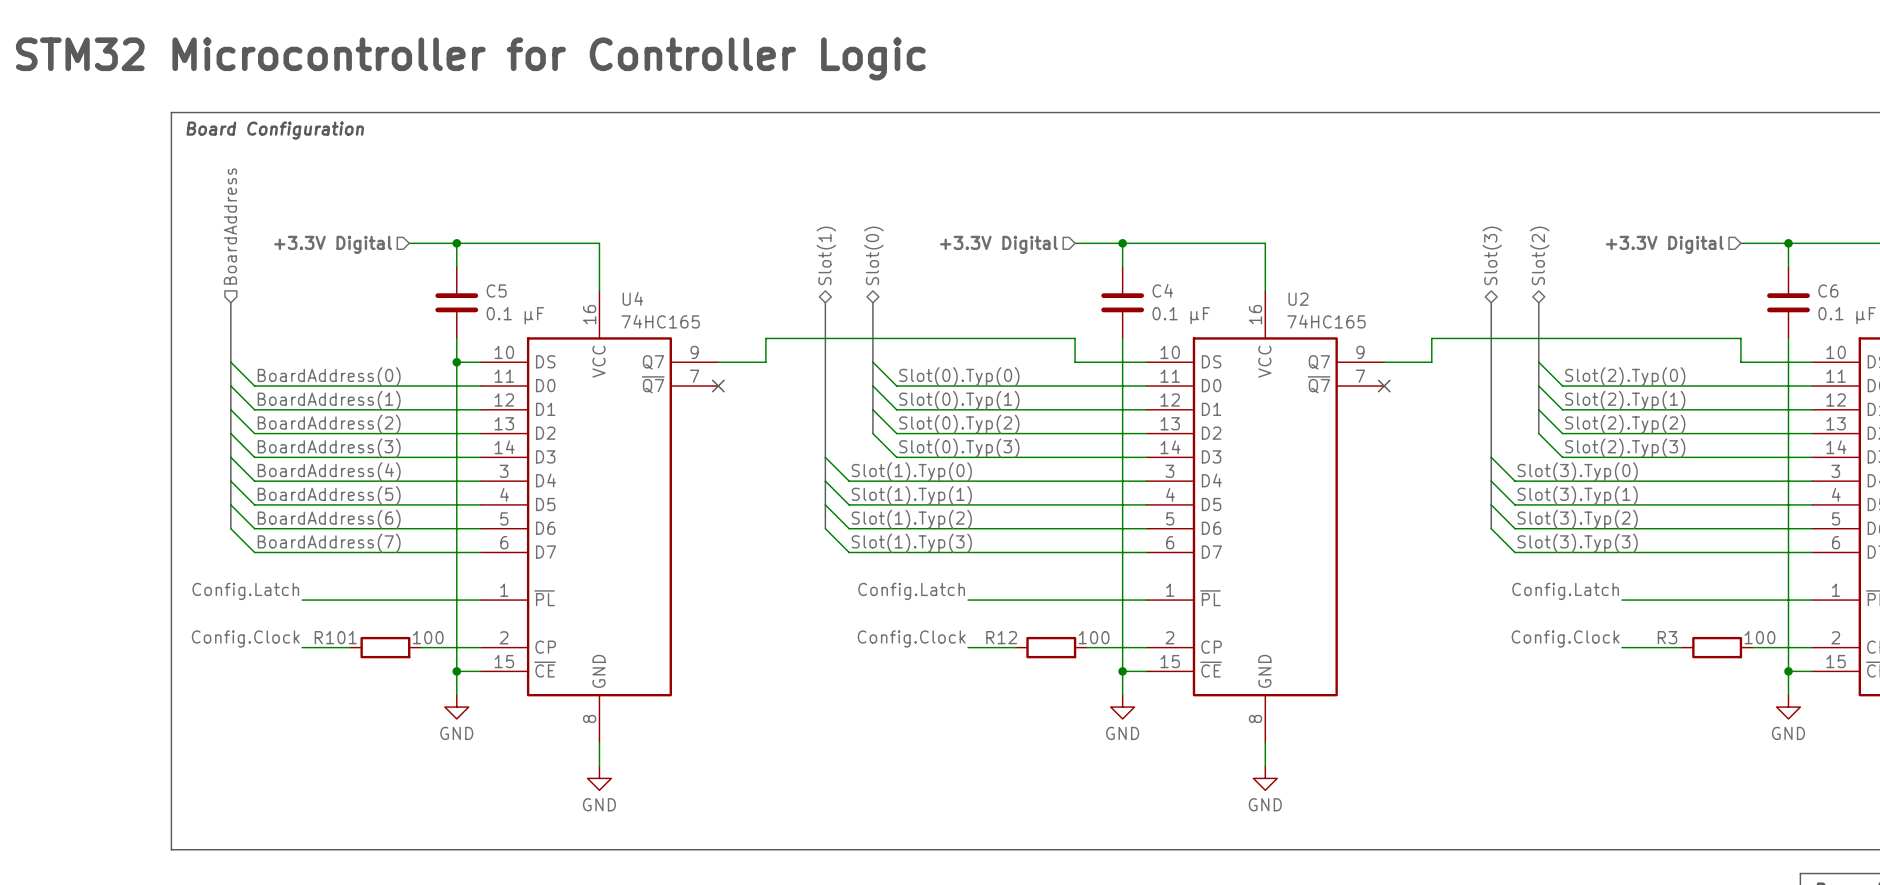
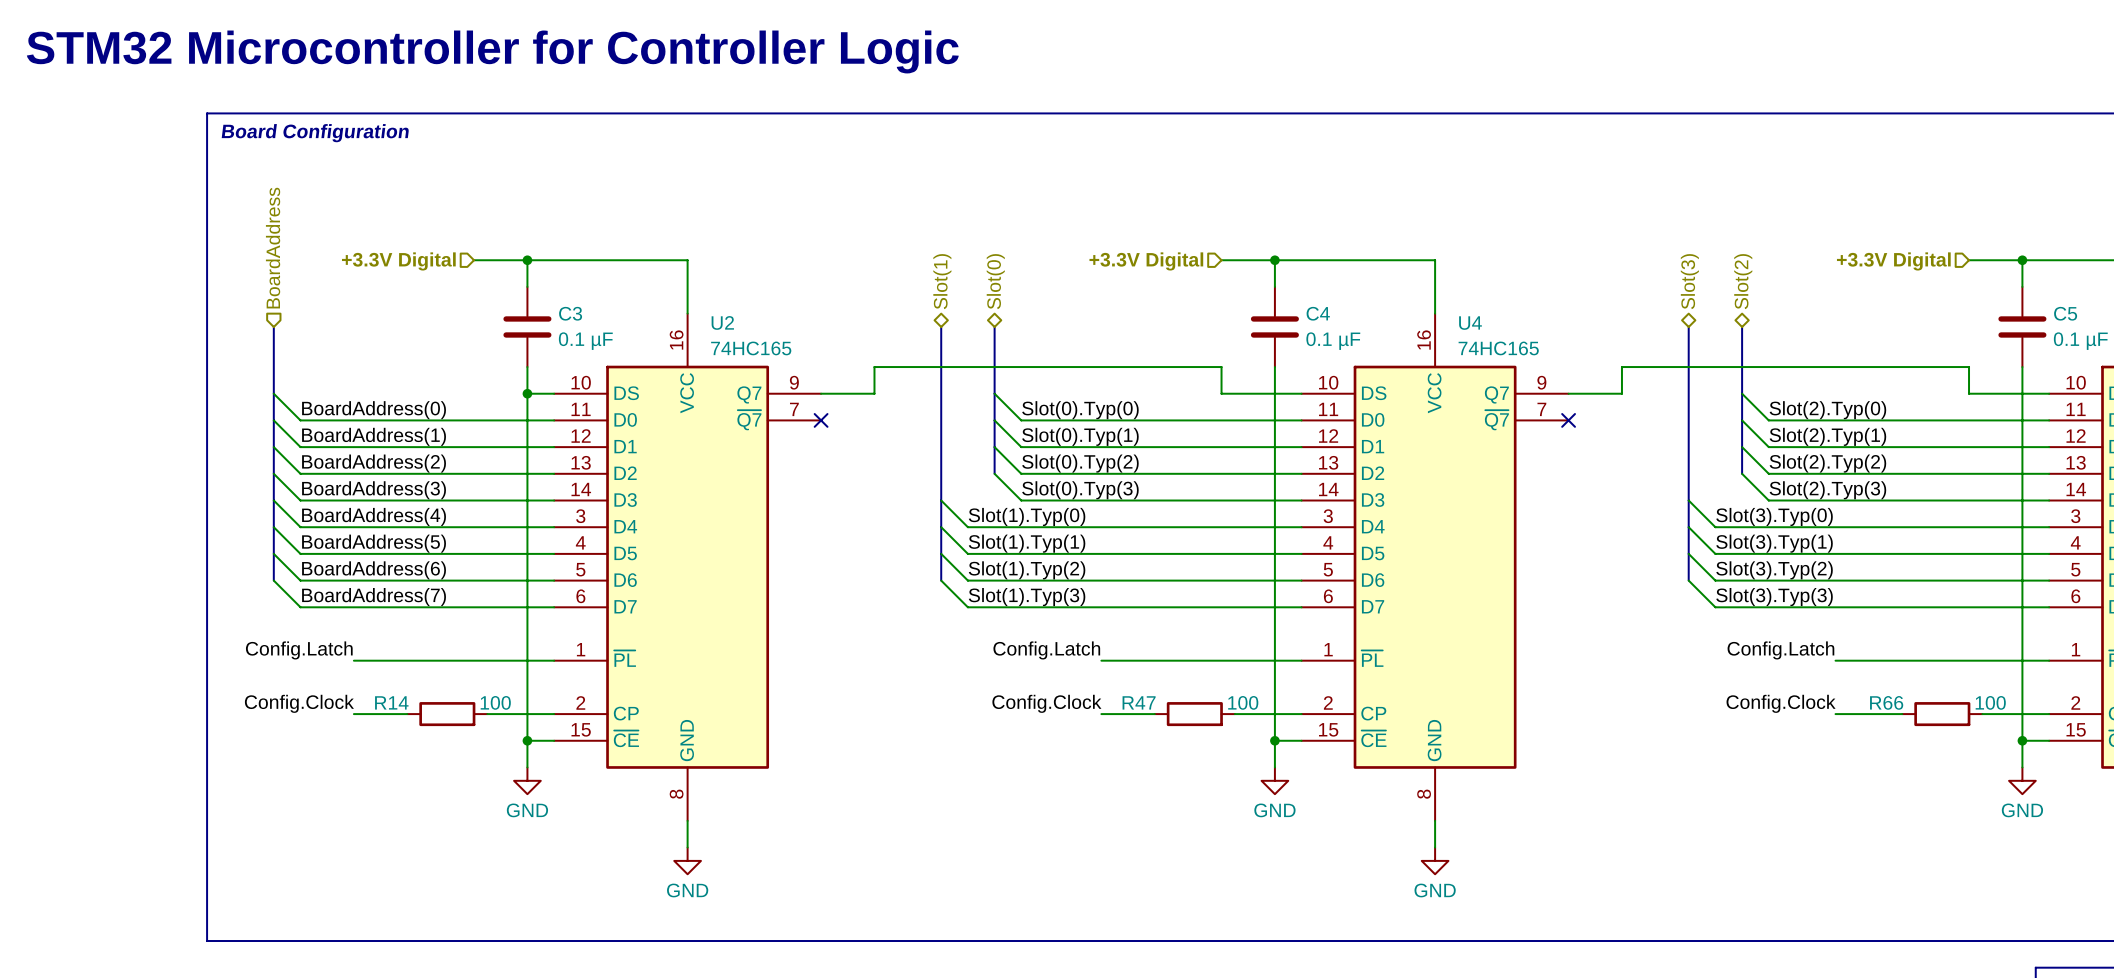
C5 name: C5 (496, 290) -> C3 (570, 313)
C6 name: C6 (1828, 290) -> C5 (2065, 313)
U4 name: U4 (632, 298) -> U2 (722, 322)
U2 name: U2 (1298, 299) -> U4 (1470, 323)
R101 name: R101 (335, 637) -> R14 (391, 702)
R12 name: R12 (1001, 637) -> R47 (1139, 702)
R3 name: R3 (1667, 637) -> R66 (1886, 702)

